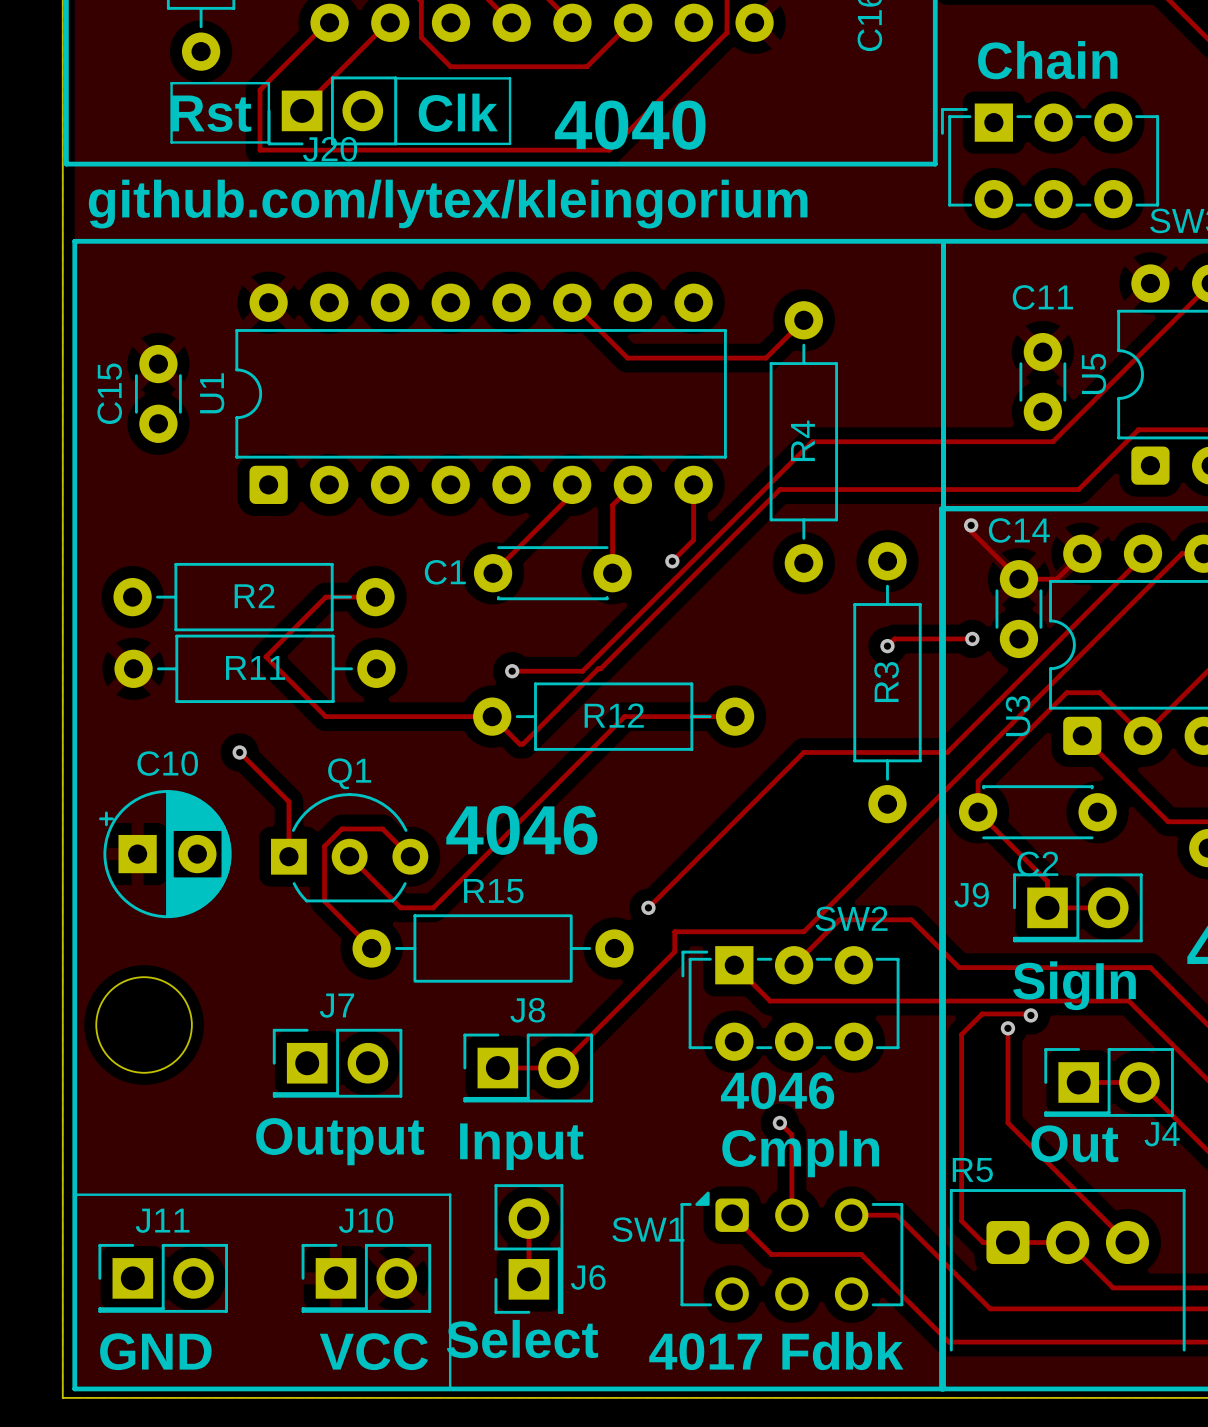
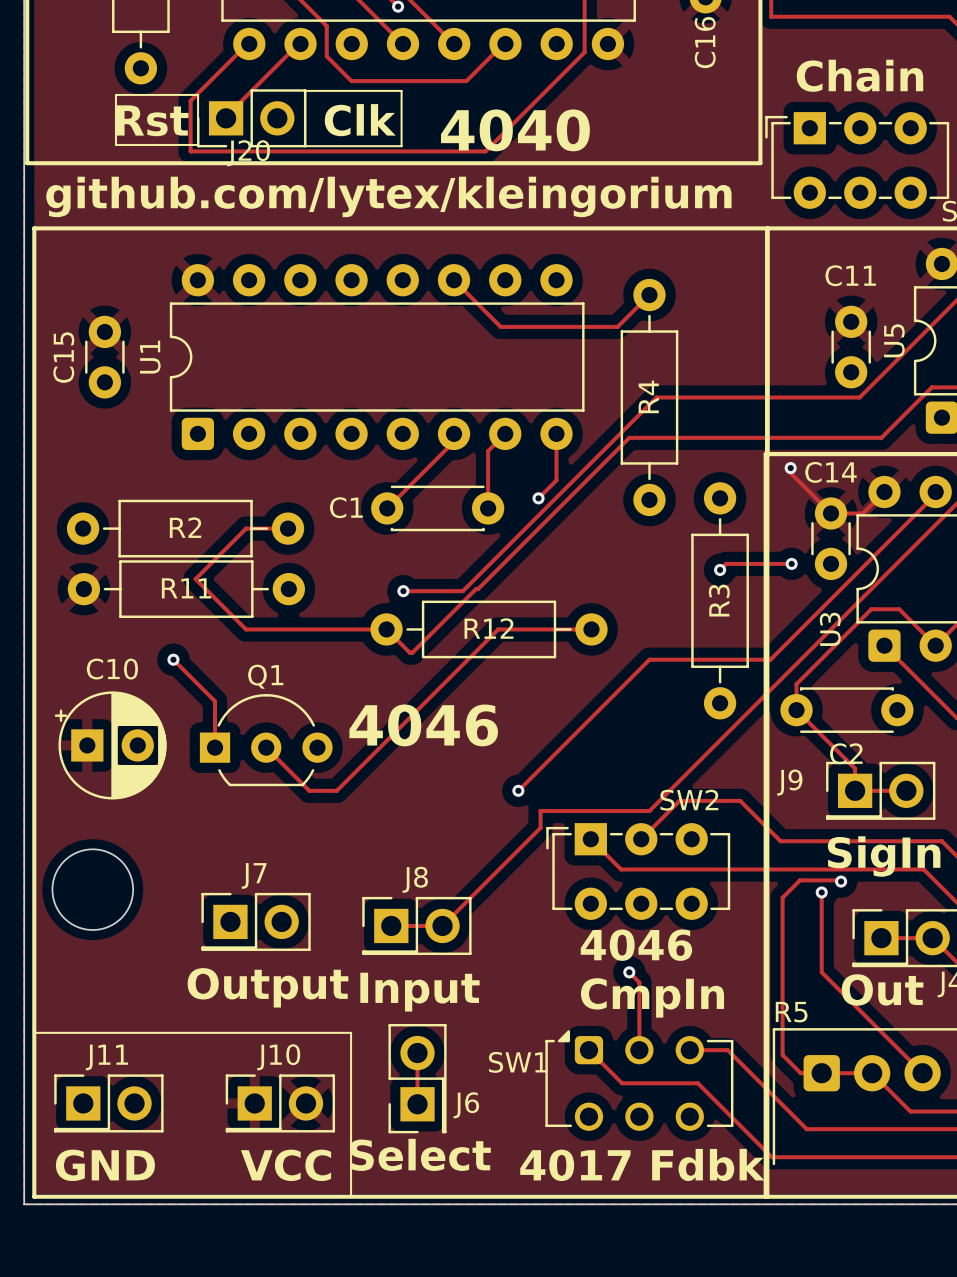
track: (404, 851) (382, 828) (341, 828) (324, 846) (324, 901) (371, 948) -> none
R15: (493, 948) -> none

